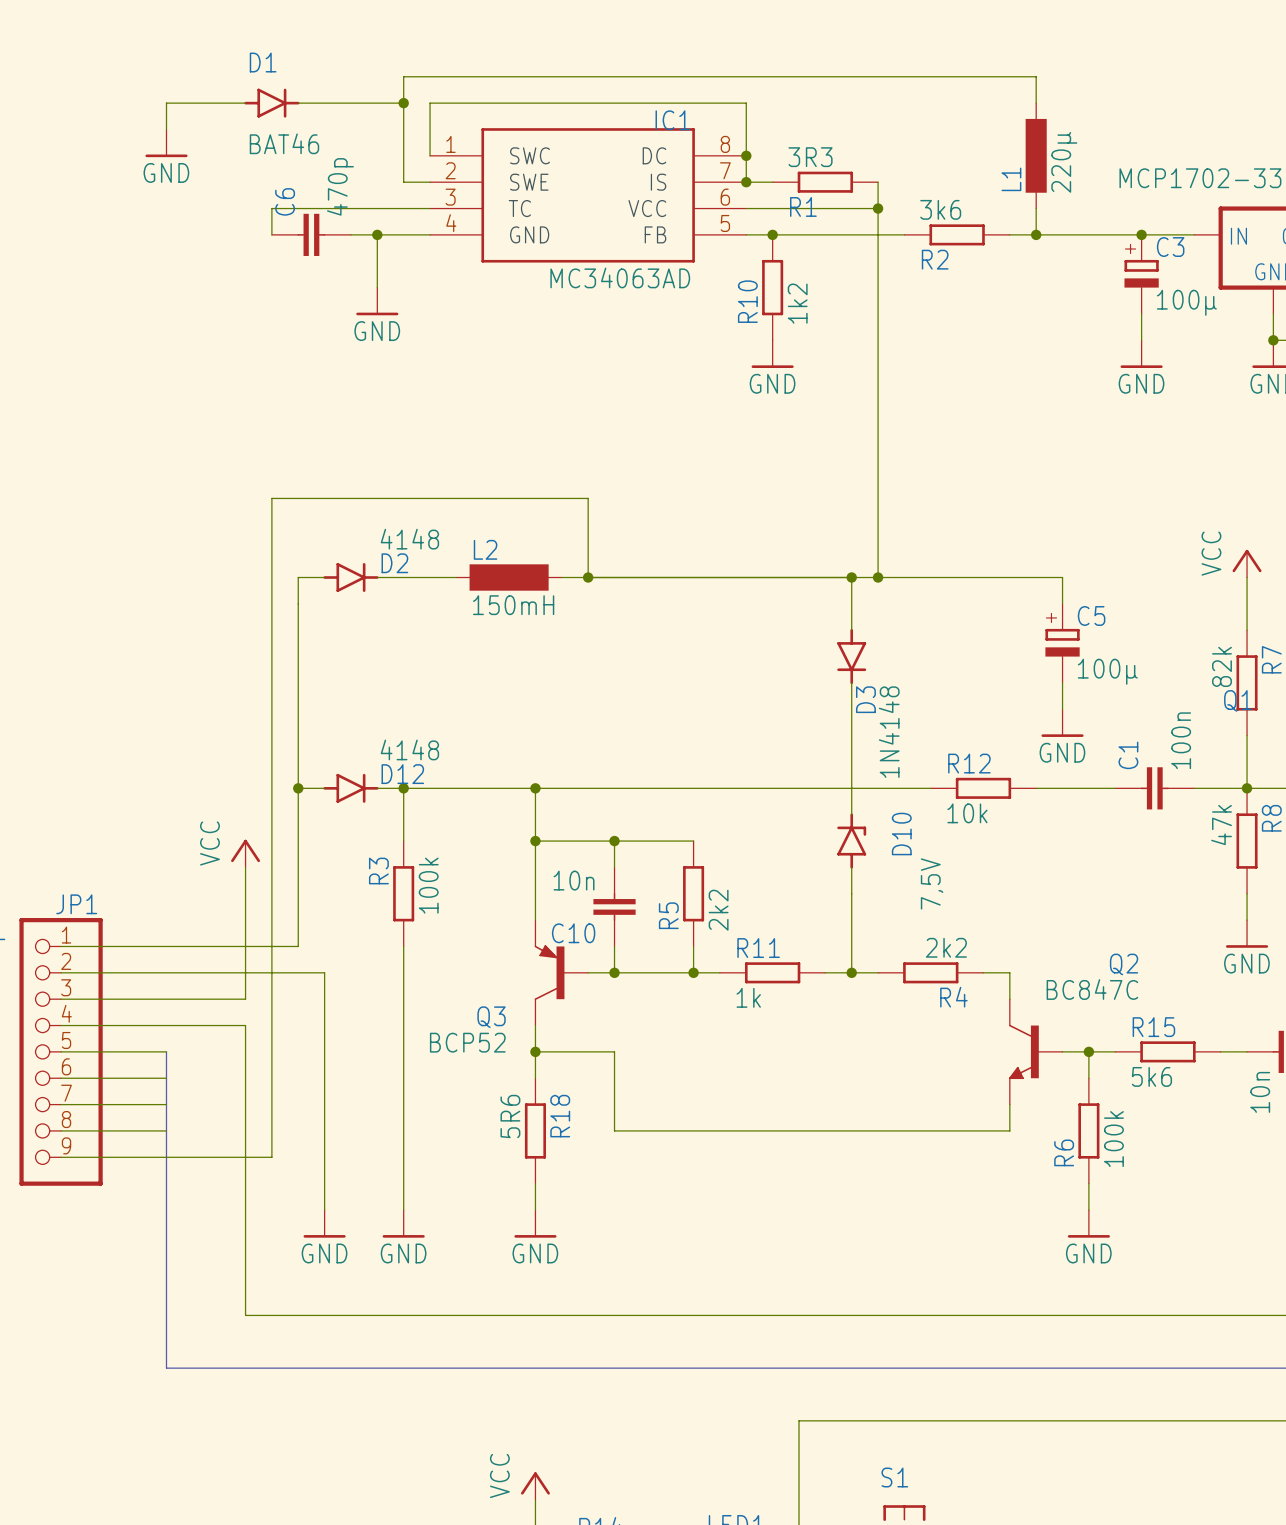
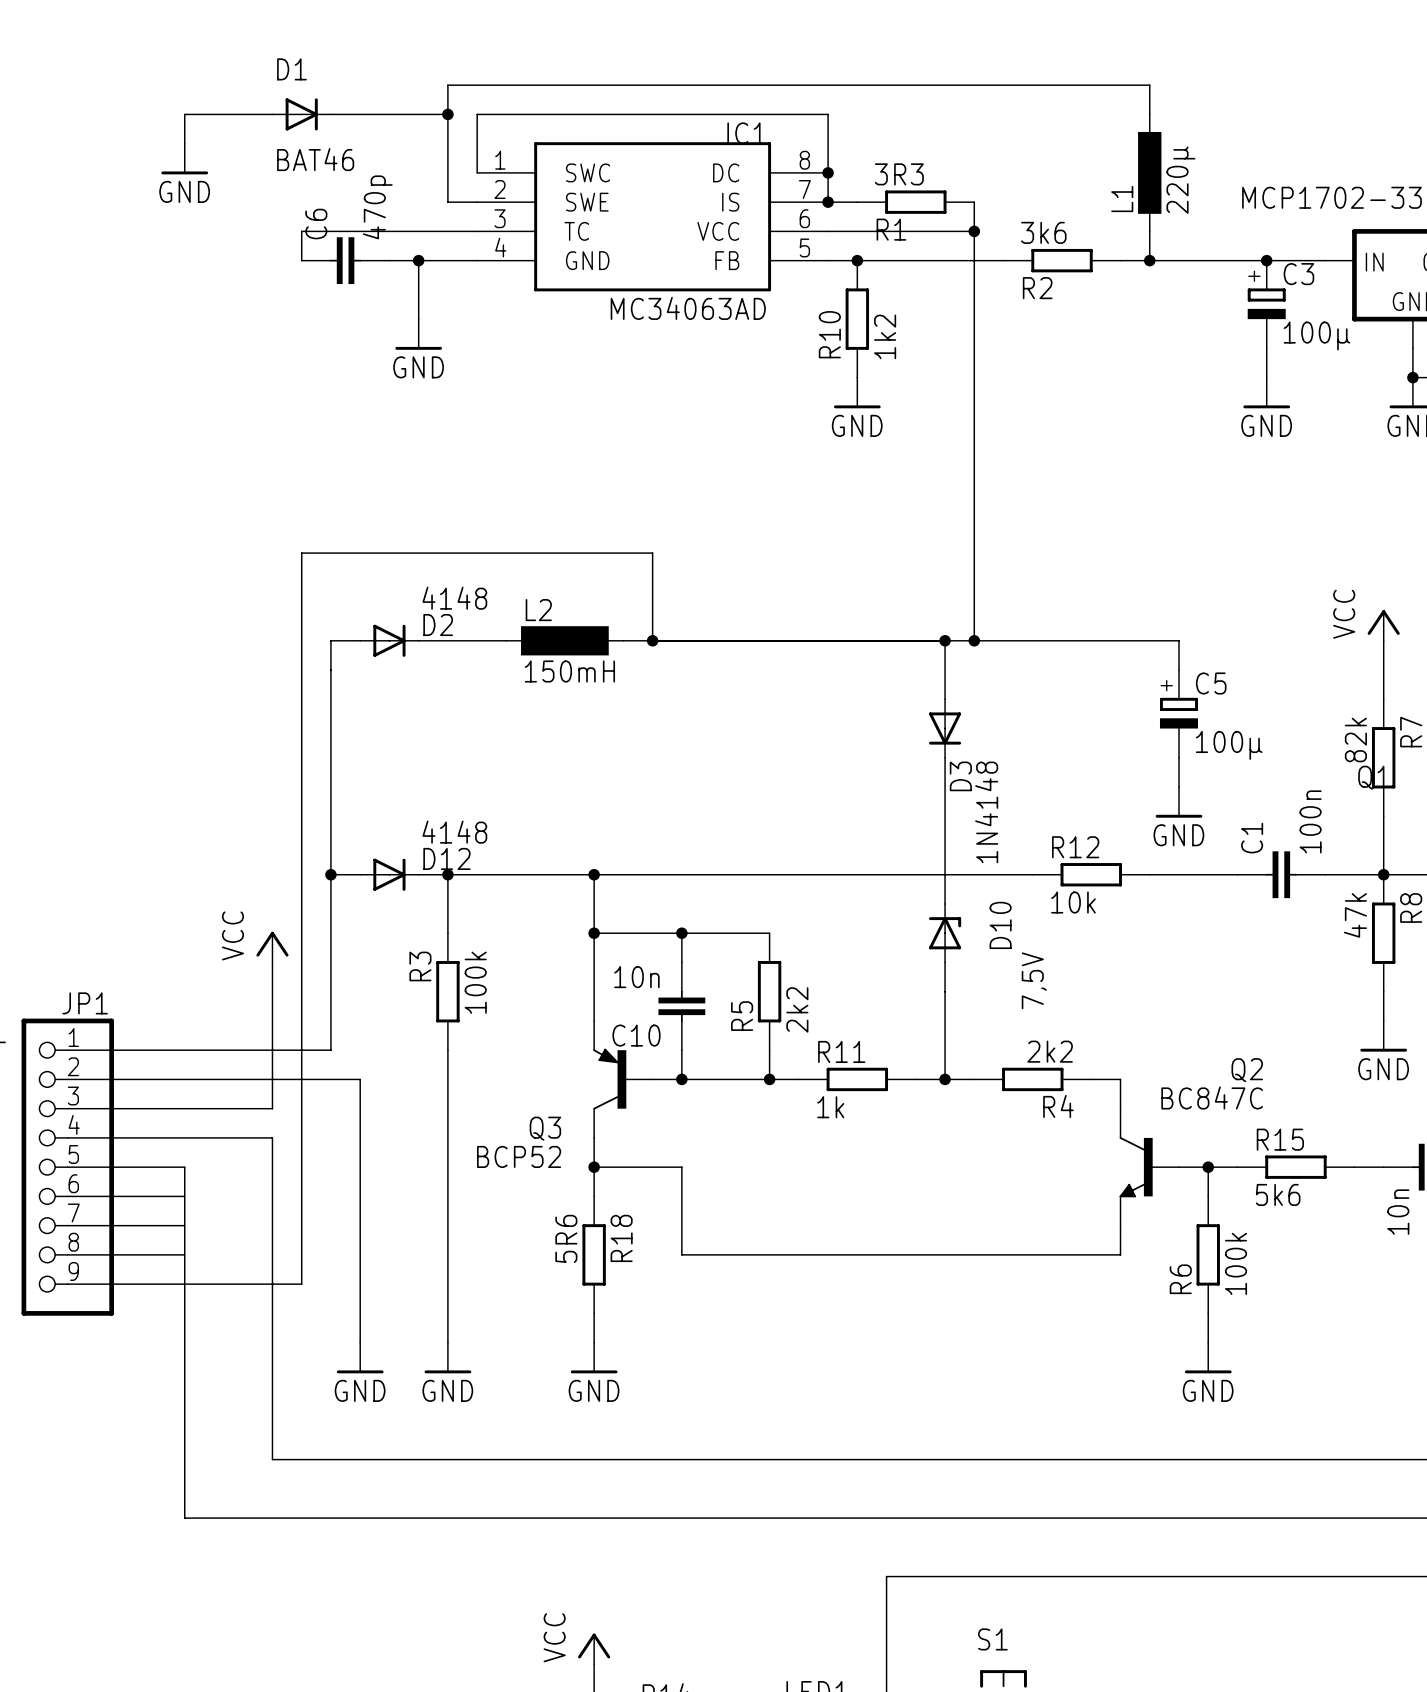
D1 symbol: [244, 88, 300, 118] -> [272, 98, 331, 131]
D2 symbol: [323, 563, 379, 593] -> [360, 624, 419, 657]
D3 symbol: [837, 628, 867, 685] -> [928, 699, 962, 758]
D12 symbol: [323, 773, 379, 803] -> [360, 858, 419, 891]
D10 symbol: [837, 813, 867, 869] -> [928, 903, 962, 963]

